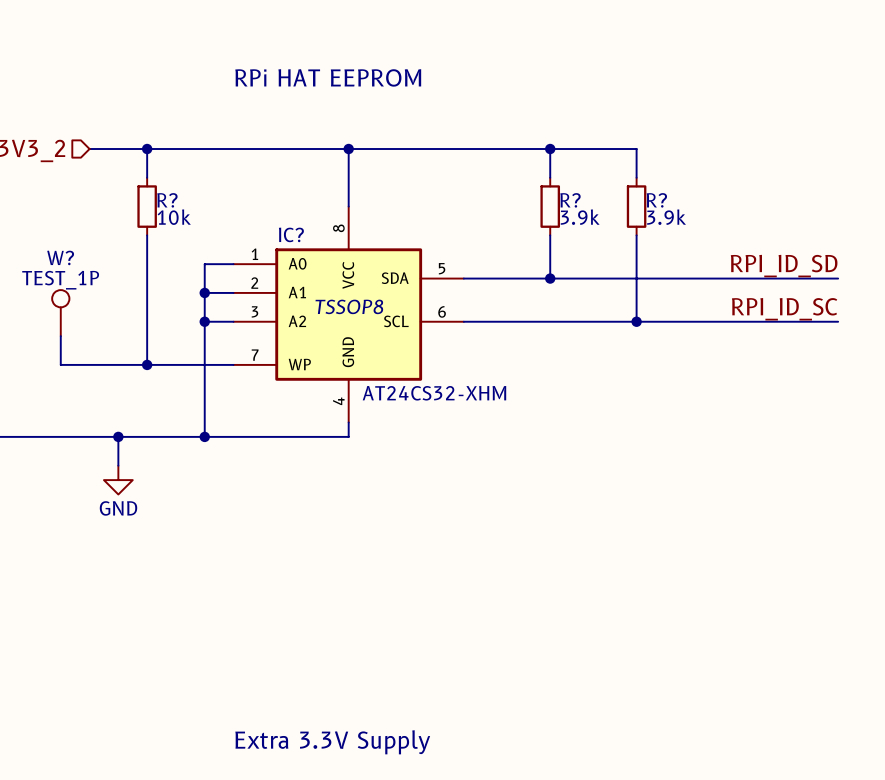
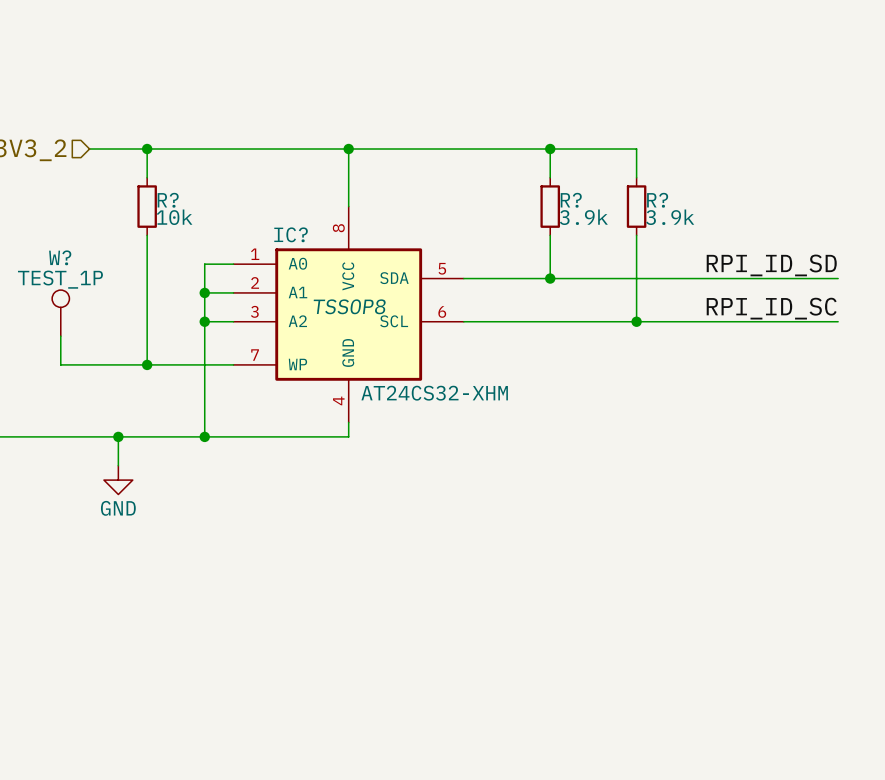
text: RPi HAT EEPROM (328, 77) -> none
text: Extra 3.3V Supply (332, 742) -> none

